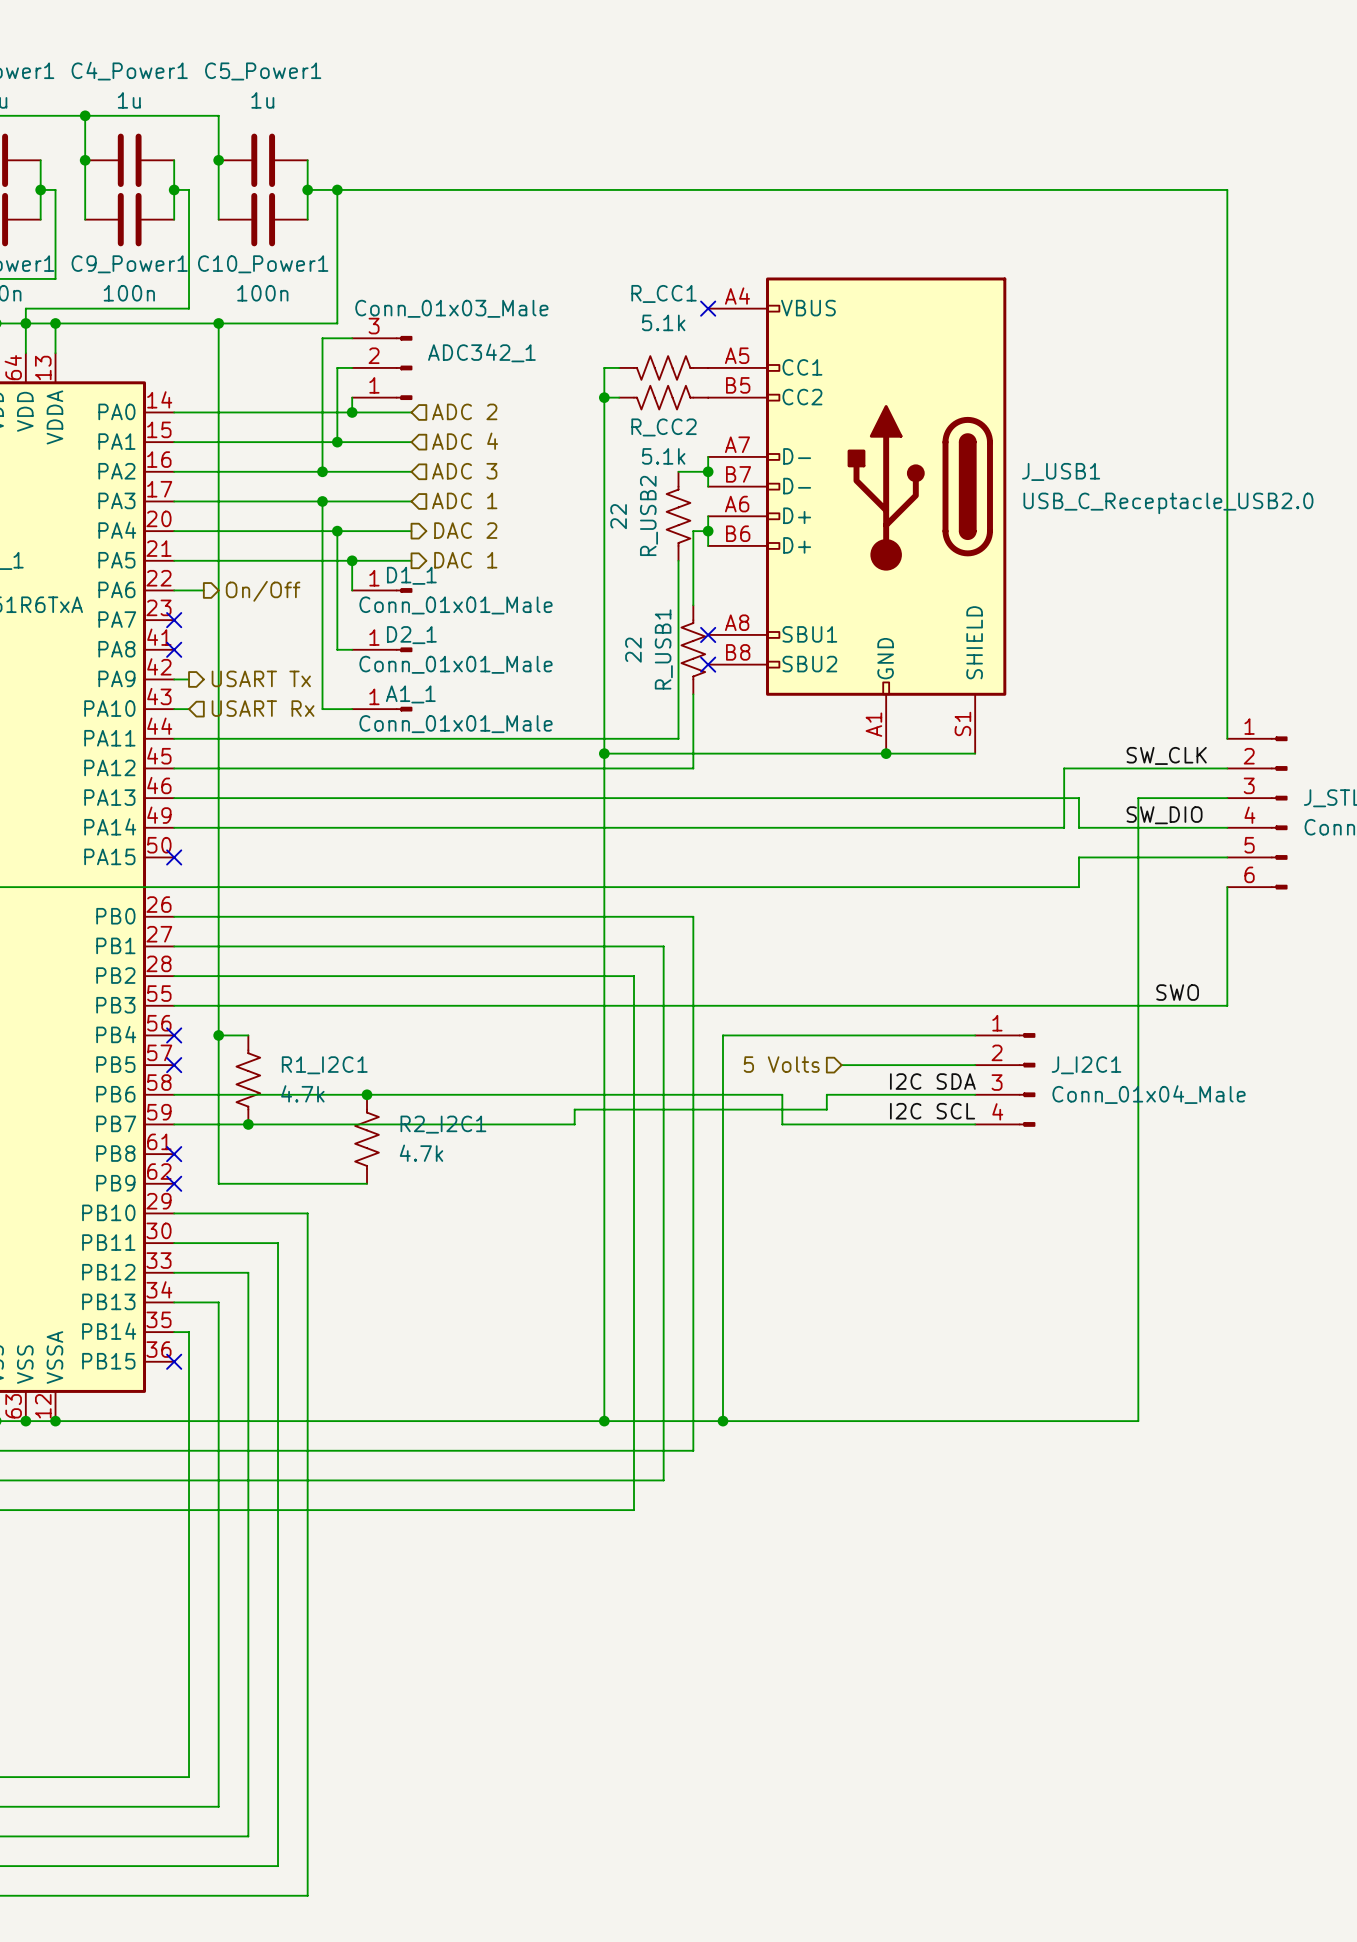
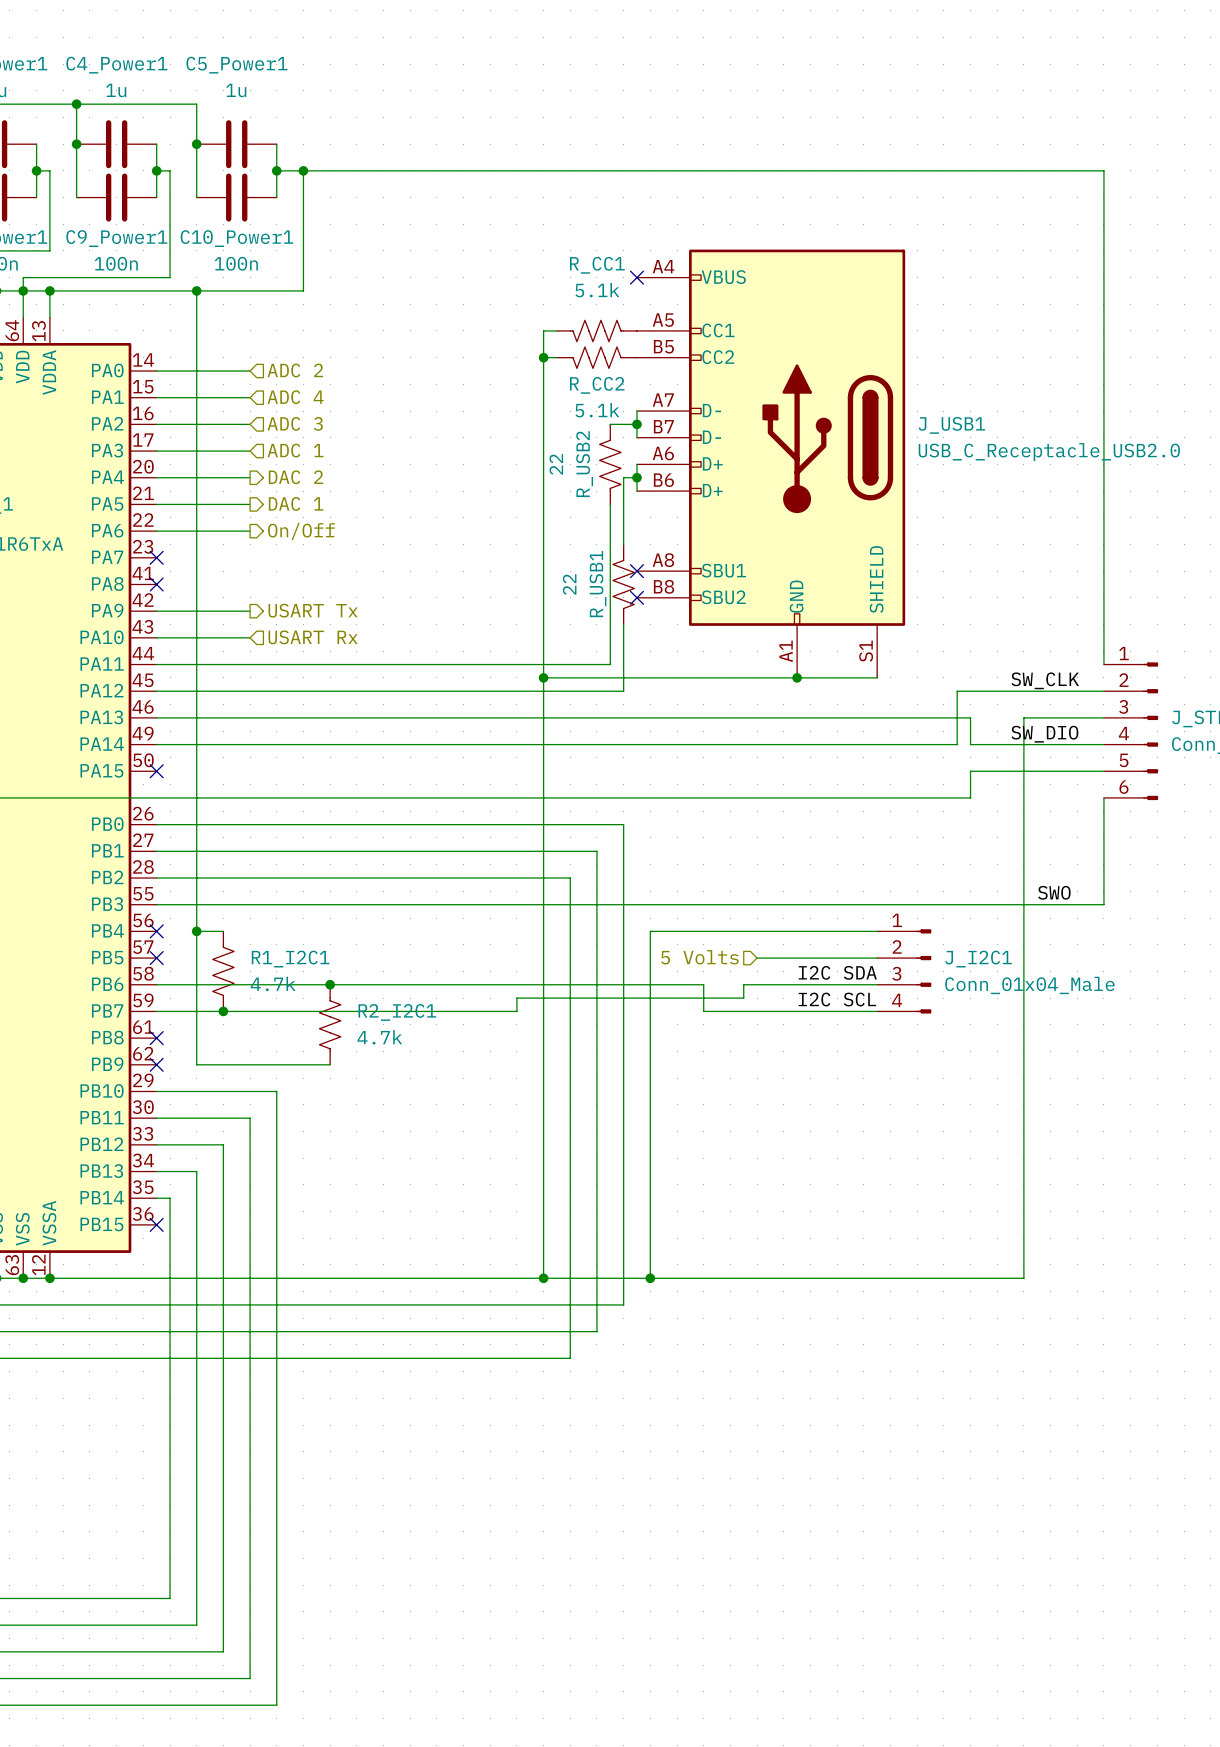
wire: (352, 338) (322, 338) (322, 471) -> none
wire: (352, 367) (337, 367) (337, 442) -> none
ADC342_1: Conn_01x03_Male (382, 367) -> none
wire: (352, 397) (352, 412) -> none
hierarchical label position: ADC 2 (464, 411) -> ADC 2 (295, 370)
wire: (278, 412) (411, 412) -> none
junction: (352, 412) -> none
hierarchical label position: ADC 4 (465, 441) -> ADC 4 (295, 397)
wire: (278, 442) (411, 442) -> none
junction: (337, 442) -> none
wire: (278, 471) (411, 471) -> none
junction: (322, 471) -> none
hierarchical label position: ADC 3 (464, 471) -> ADC 3 (295, 423)
hierarchical label position: ADC 1 (464, 500) -> ADC 1 (295, 450)
wire: (278, 501) (411, 501) -> none
wire: (322, 501) (322, 709) (352, 709) -> none
junction: (322, 501) -> none
hierarchical label position: DAC 2 (465, 530) -> DAC 2 (295, 477)
wire: (278, 531) (411, 531) -> none
wire: (337, 531) (337, 649) (352, 649) -> none
junction: (337, 531) -> none
wire: (278, 560) (411, 560) -> none
wire: (352, 560) (352, 590) -> none
junction: (352, 560) -> none
hierarchical label position: DAC 1 (465, 560) -> DAC 1 (296, 503)
wire: none -> (183, 531) (250, 531)
D1_1: Conn_01x01_Male (382, 590) -> none
hierarchical label position: On/Off (263, 591) -> On/Off (301, 531)
D2_1: Conn_01x01_Male (382, 649) -> none
hierarchical label position: USART Tx (261, 678) -> USART Tx (313, 610)
wire: none -> (170, 611) (250, 611)
hierarchical label position: USART Rx (263, 708) -> USART Rx (313, 637)
wire: none -> (170, 637) (250, 637)
A1_1: Conn_01x01_Male (382, 709) -> none

